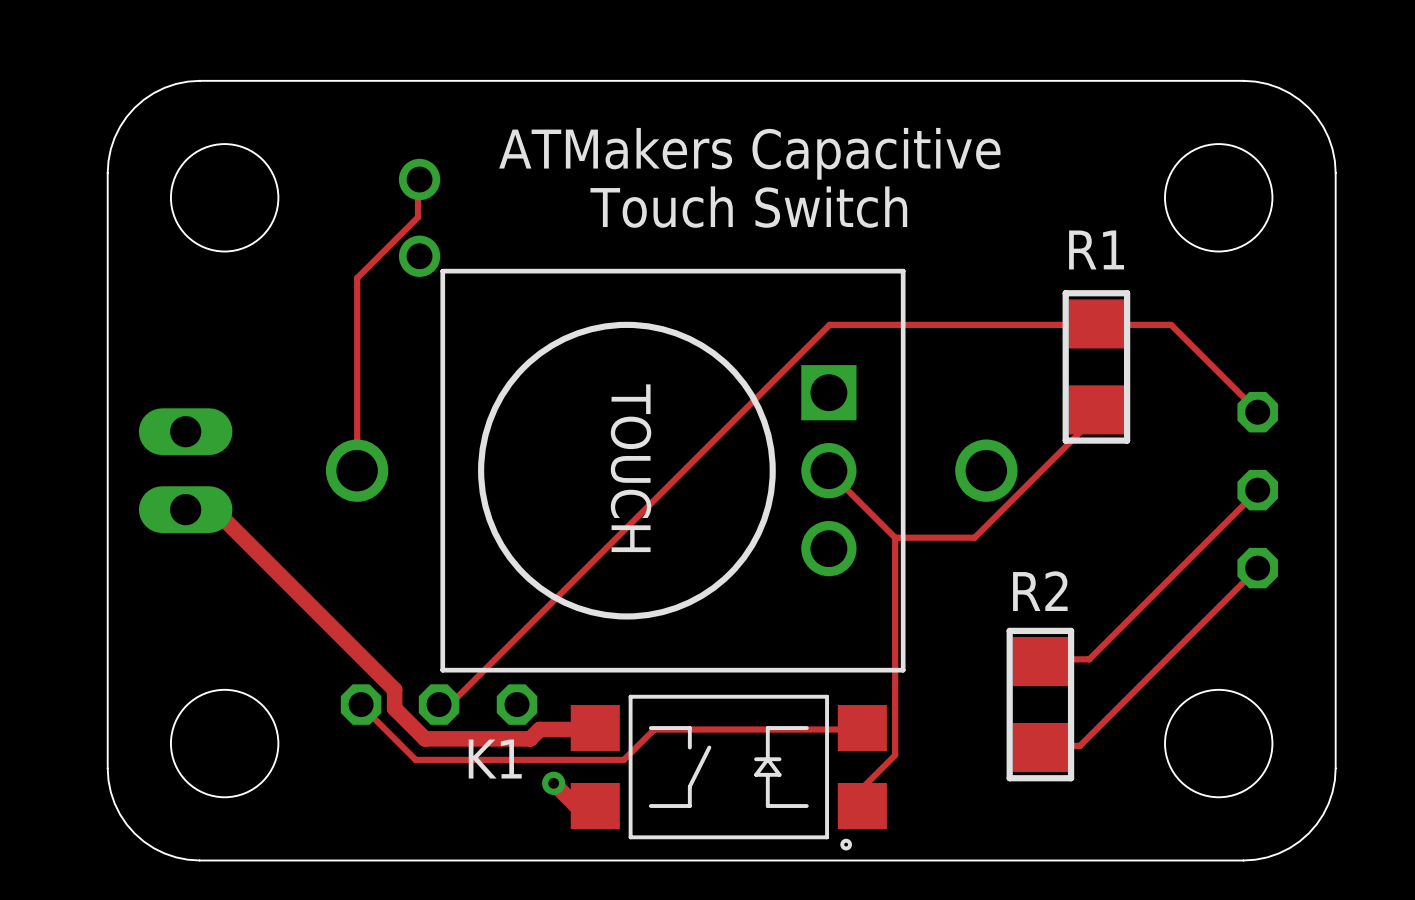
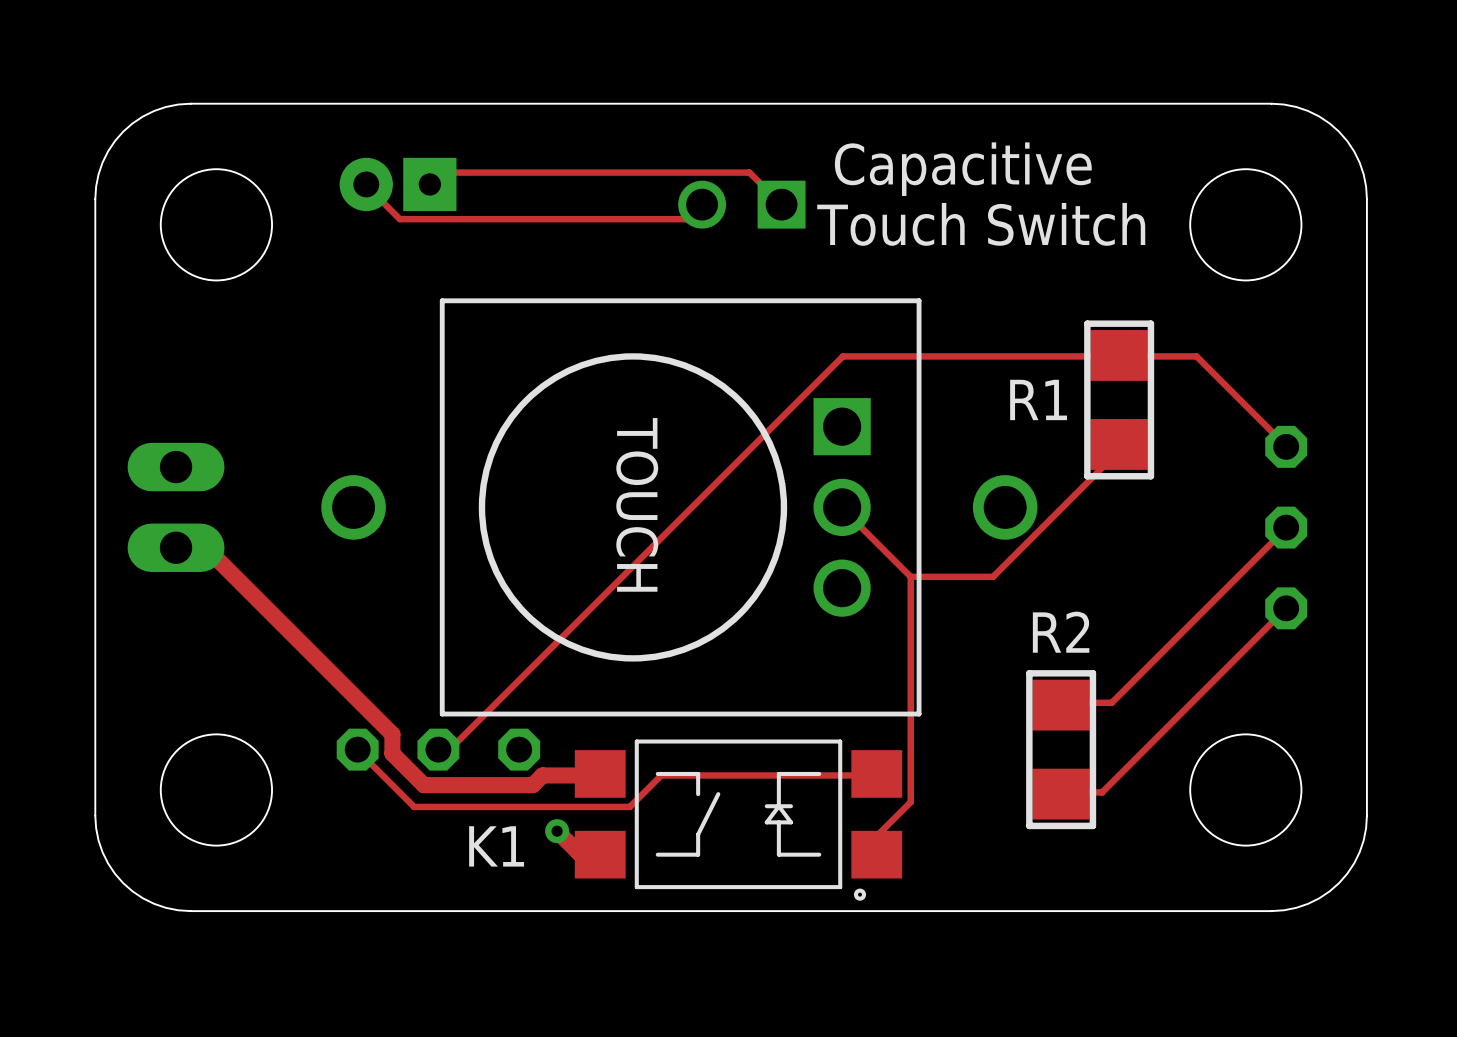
text: ATMakers Capacitive (749, 153) -> Capacitive (963, 169)
track: none -> (366, 184) (399, 219) (687, 219) (701, 204)
part: none -> (398, 184)
track: none -> (429, 184) (443, 172) (749, 172) (781, 204)
part: none -> (741, 204)
track: (419, 179) (418, 179) (418, 217) (357, 278) (357, 470) -> none
text position: Touch Switch (748, 207) -> Touch Switch (981, 224)
part: (419, 217) -> none
R1 name position: R1 (1096, 249) -> R1 (1038, 399)
K1 name position: K1 (495, 759) -> K1 (496, 846)

